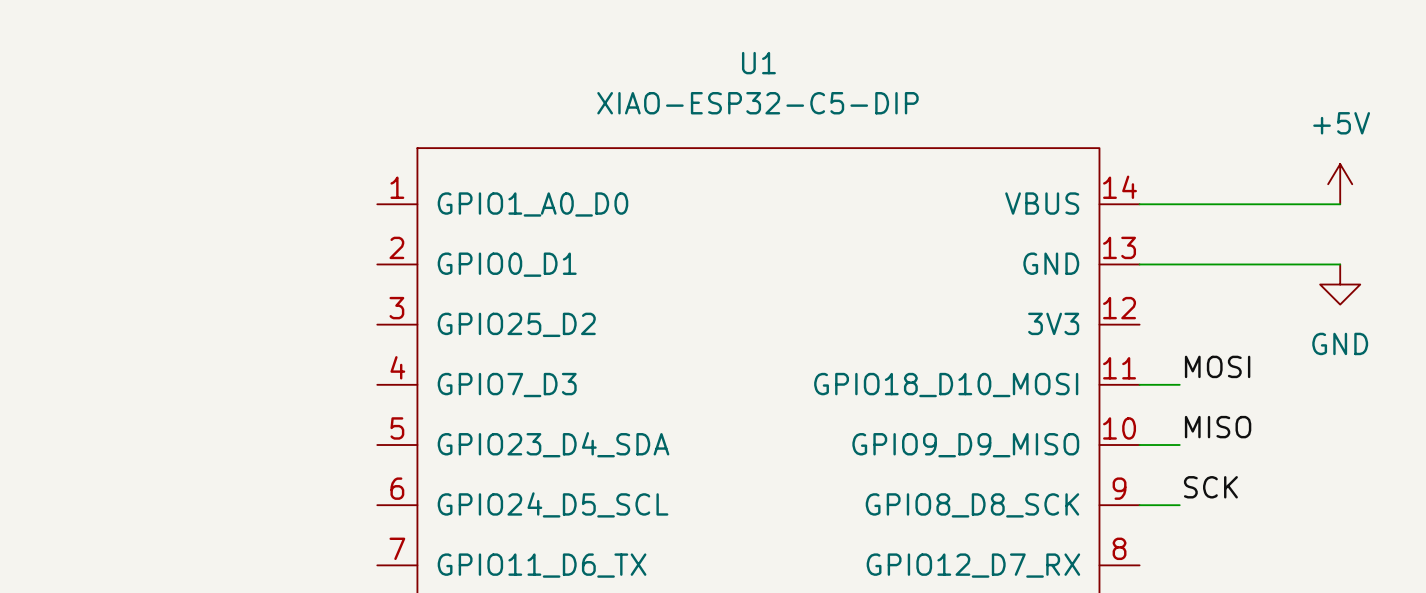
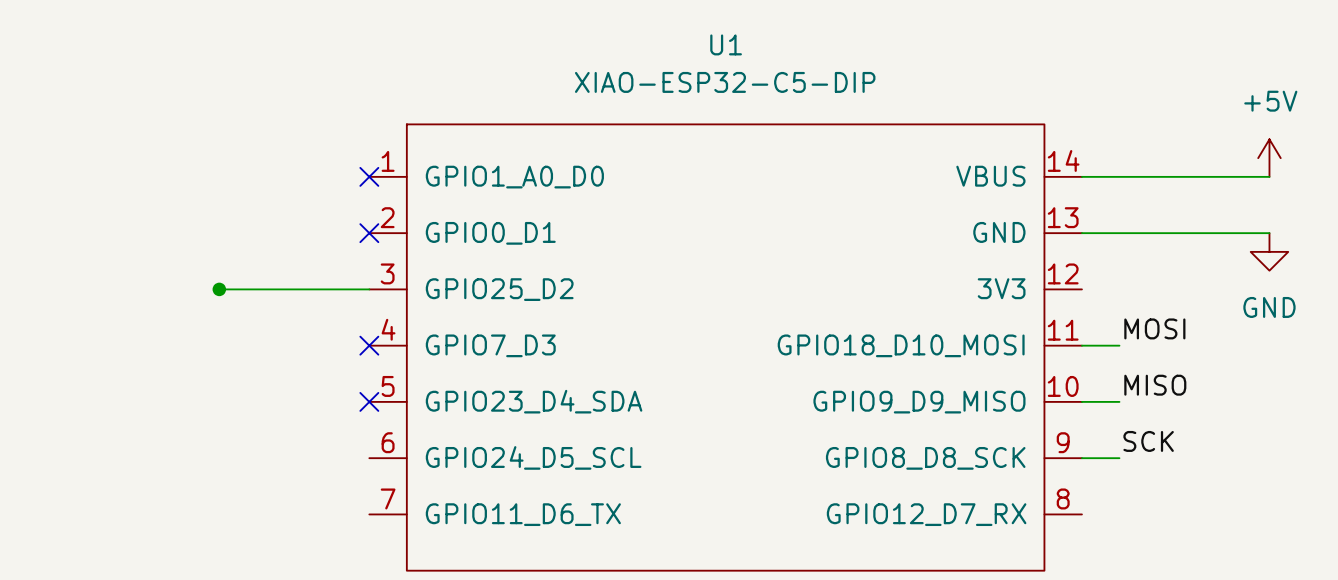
no-connect mark: none -> (369, 176)
no-connect mark: none -> (369, 233)
wire: none -> (219, 289) (369, 289)
junction: none -> (219, 289)
no-connect mark: none -> (369, 345)
no-connect mark: none -> (369, 401)

